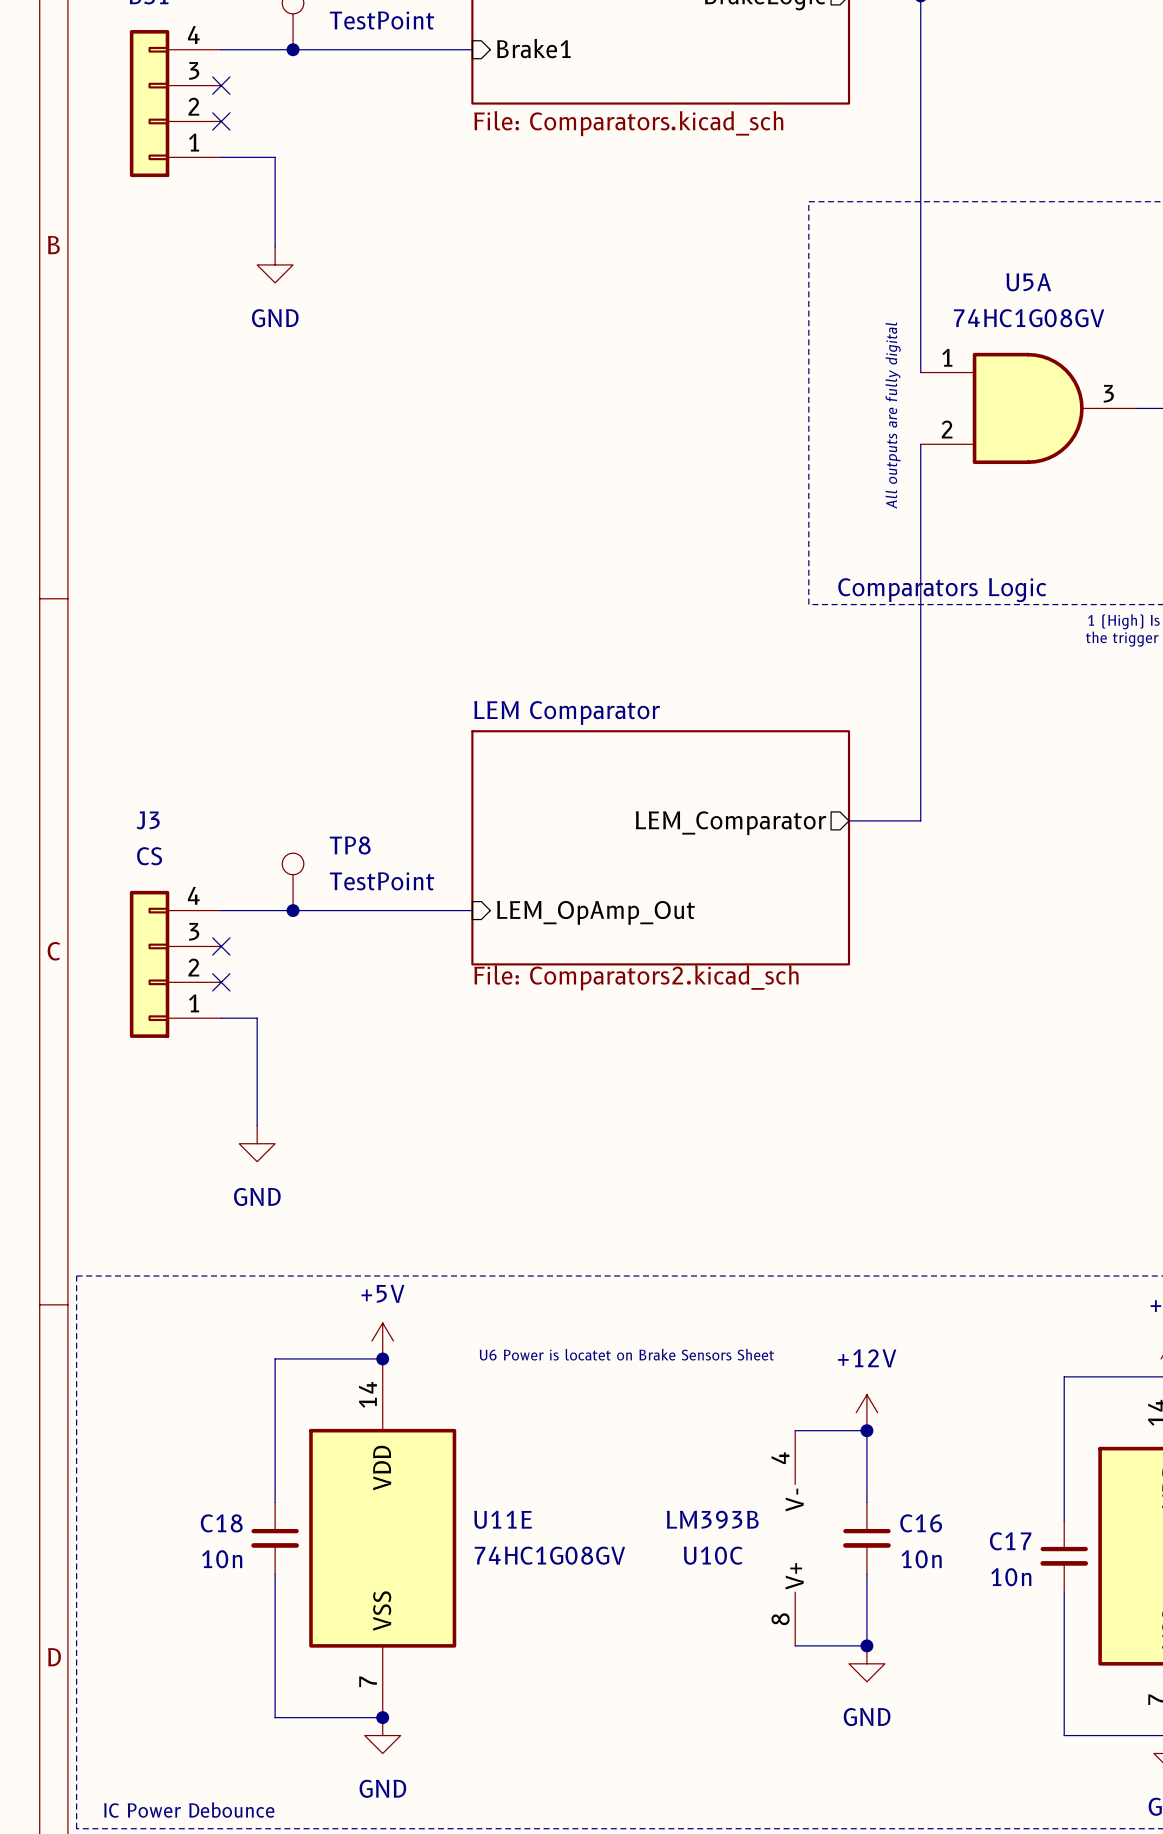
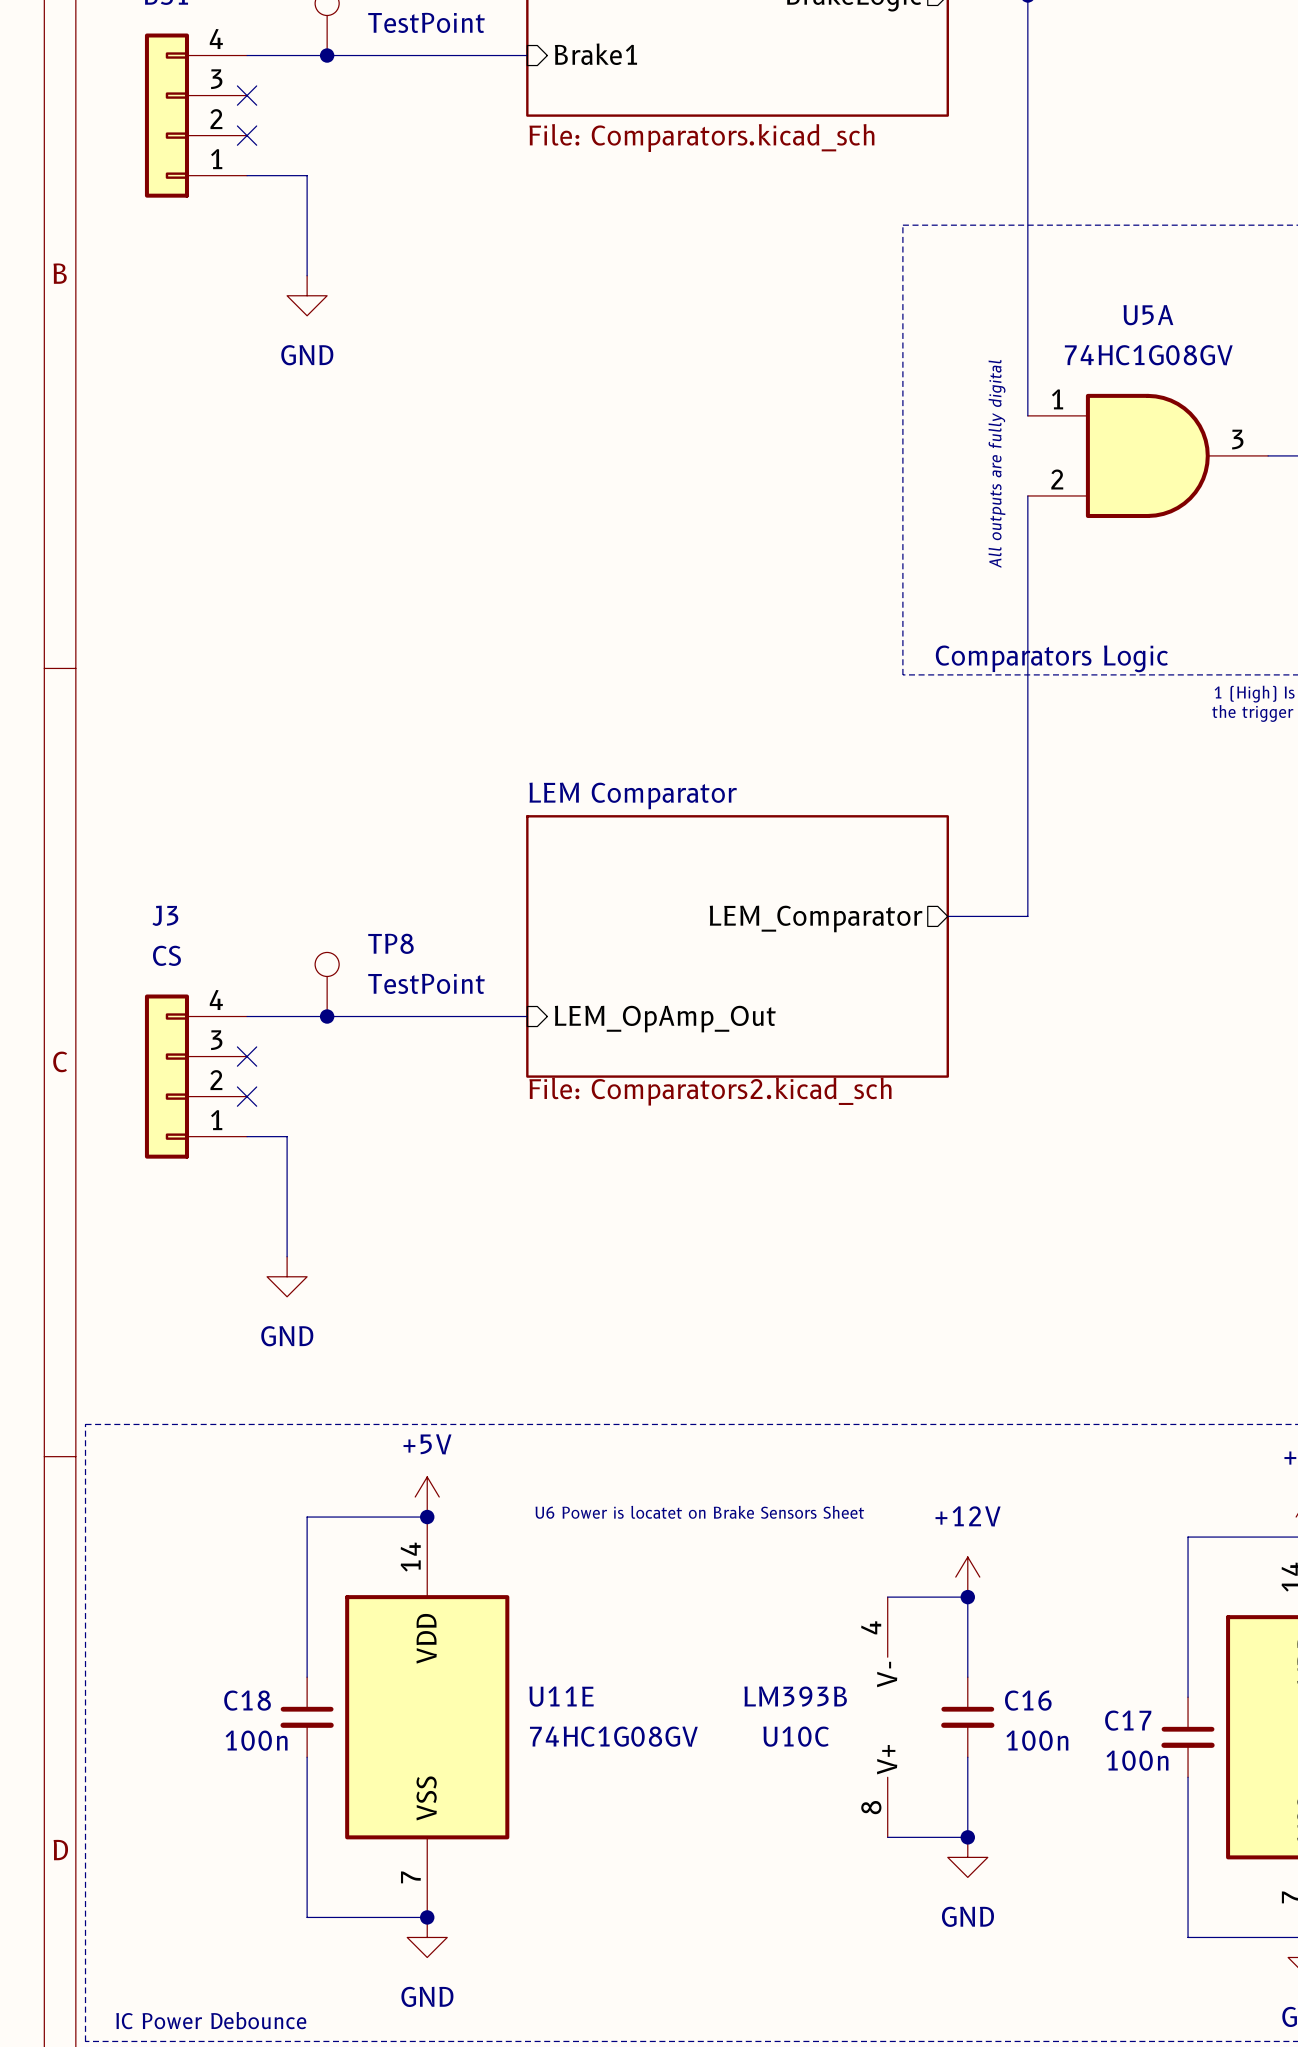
C18 value: 10n (222, 1559) -> 100n (256, 1740)
C16 value: 10n (921, 1559) -> 100n (1037, 1740)
C17 value: 10n (1011, 1577) -> 100n (1137, 1760)

